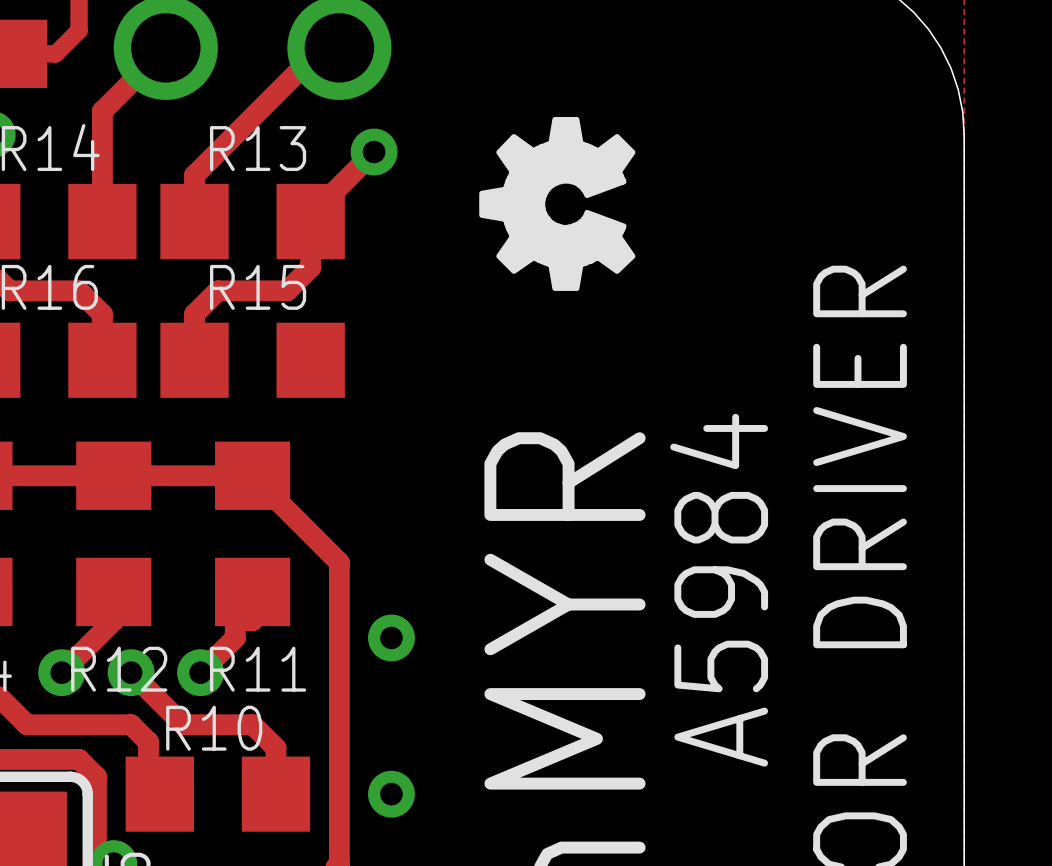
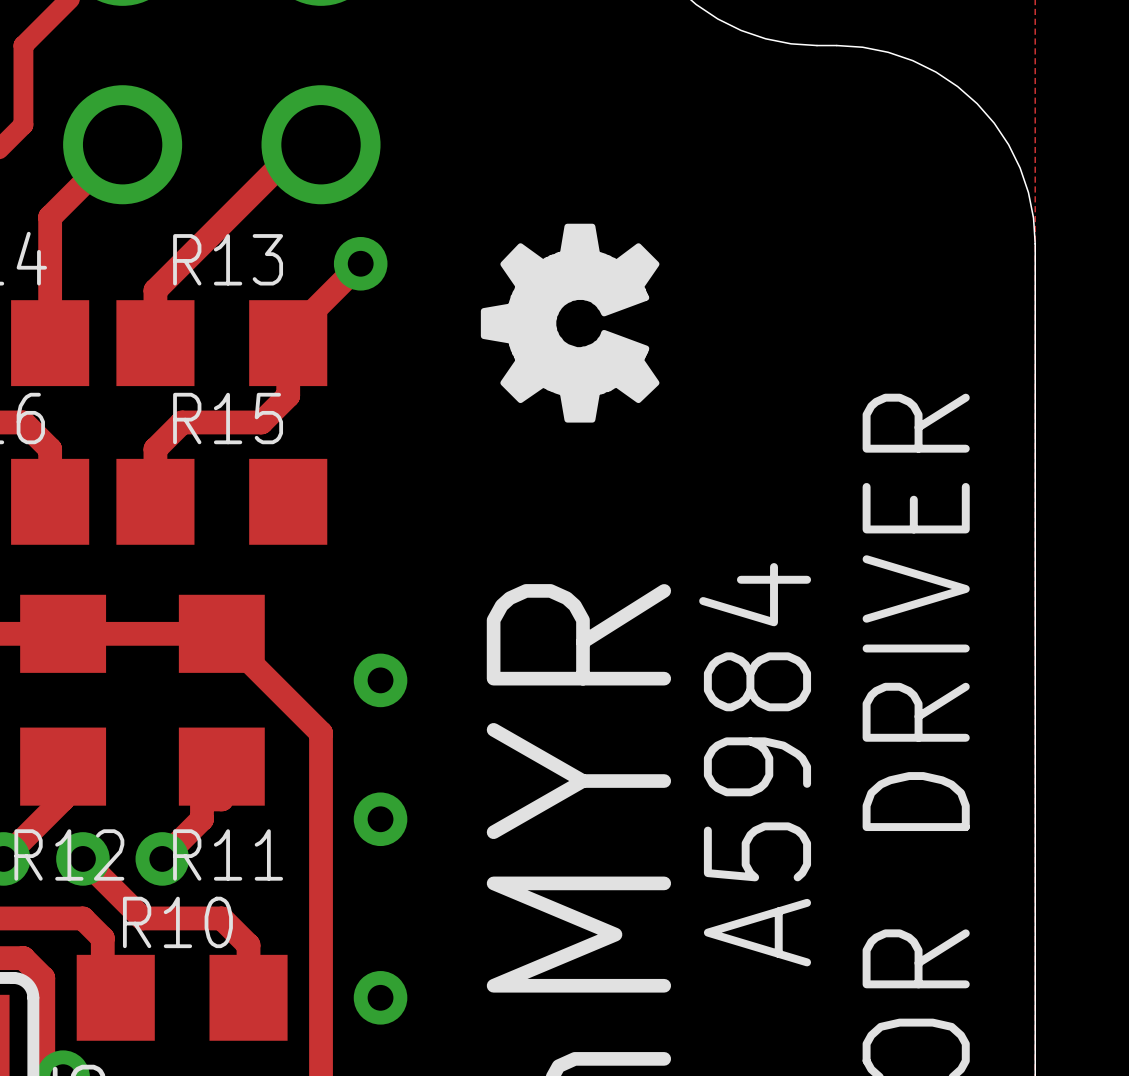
via: none -> (380, 680)

